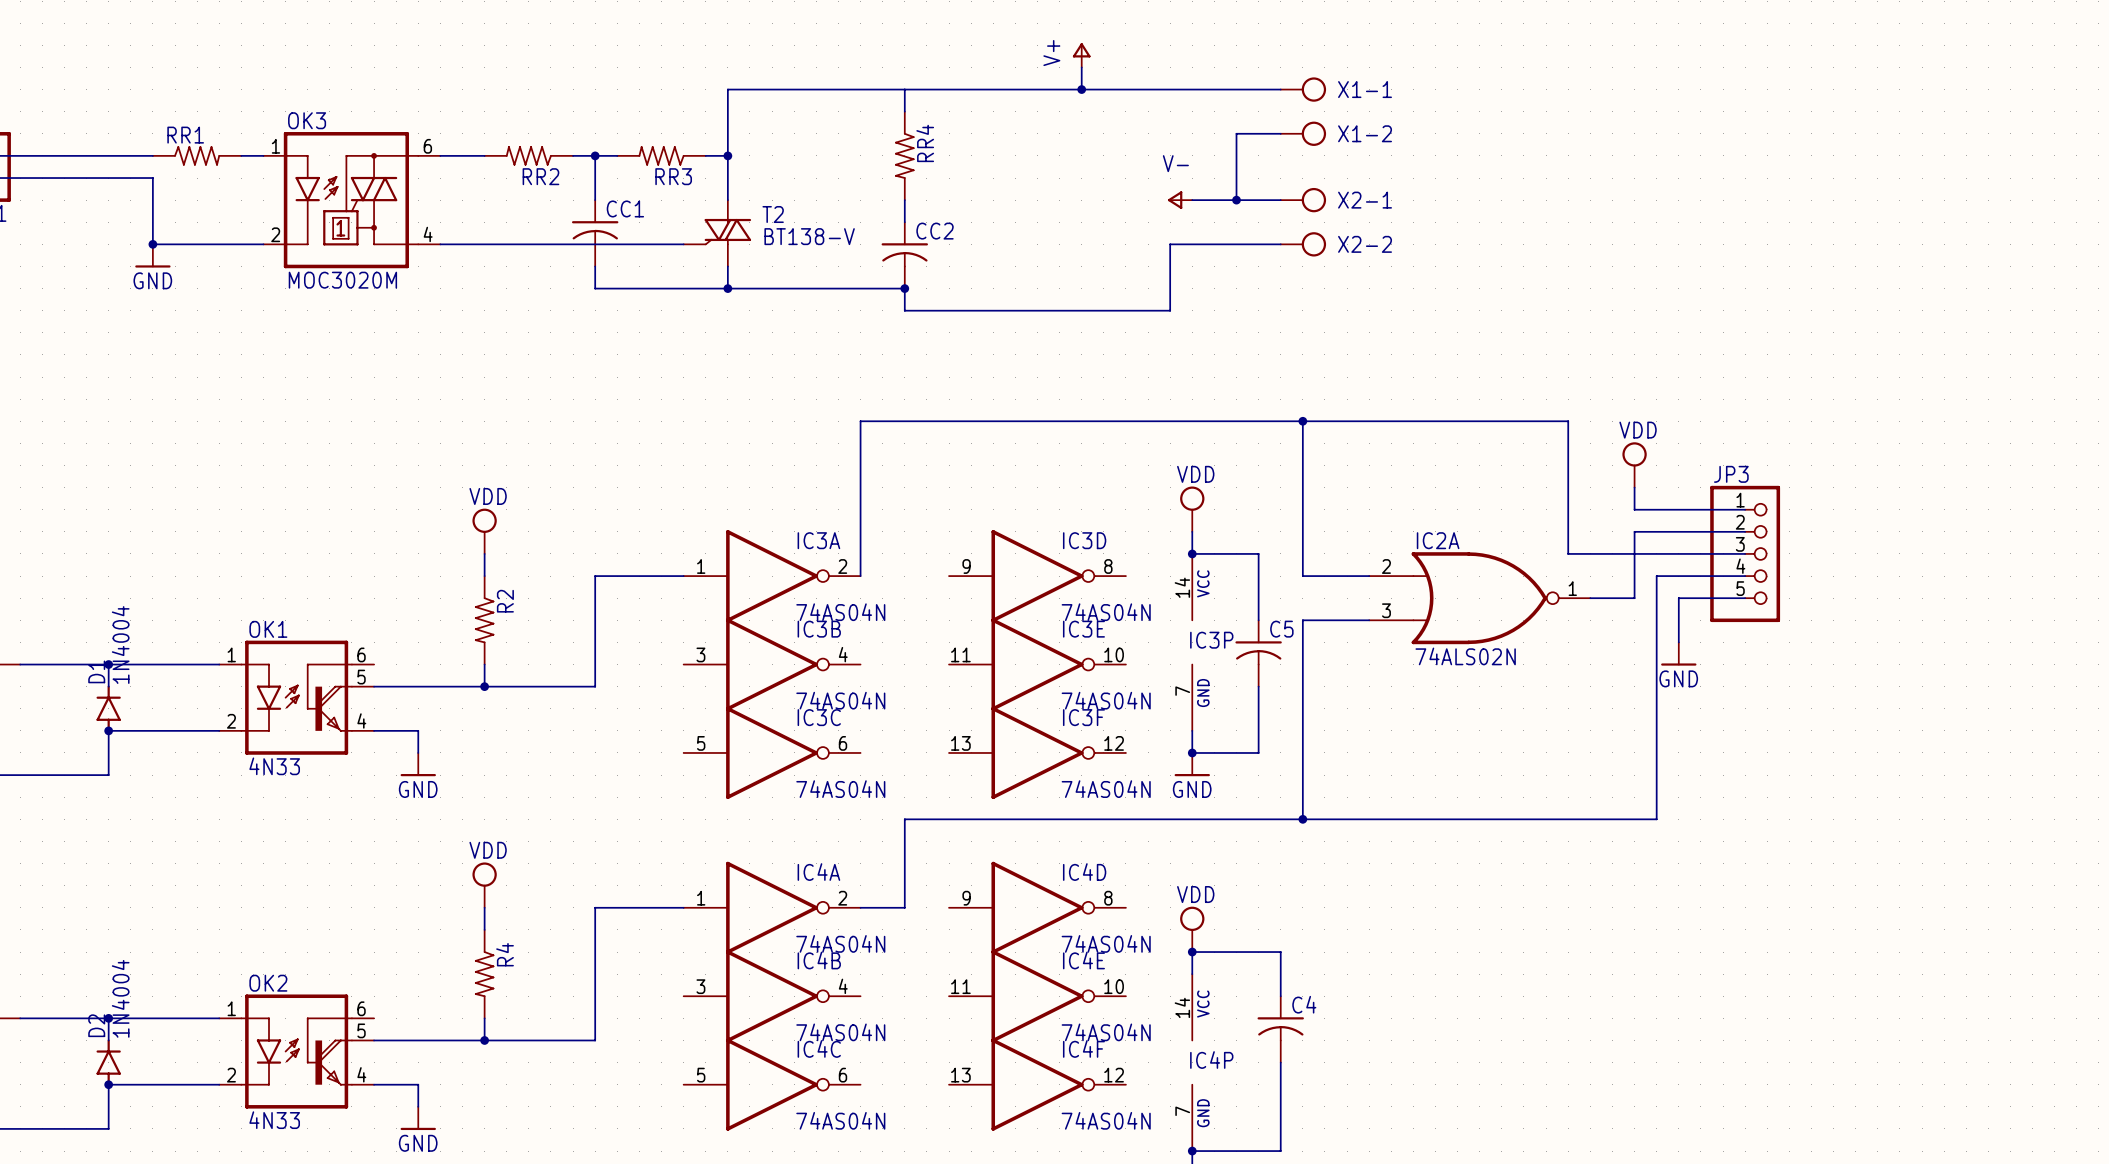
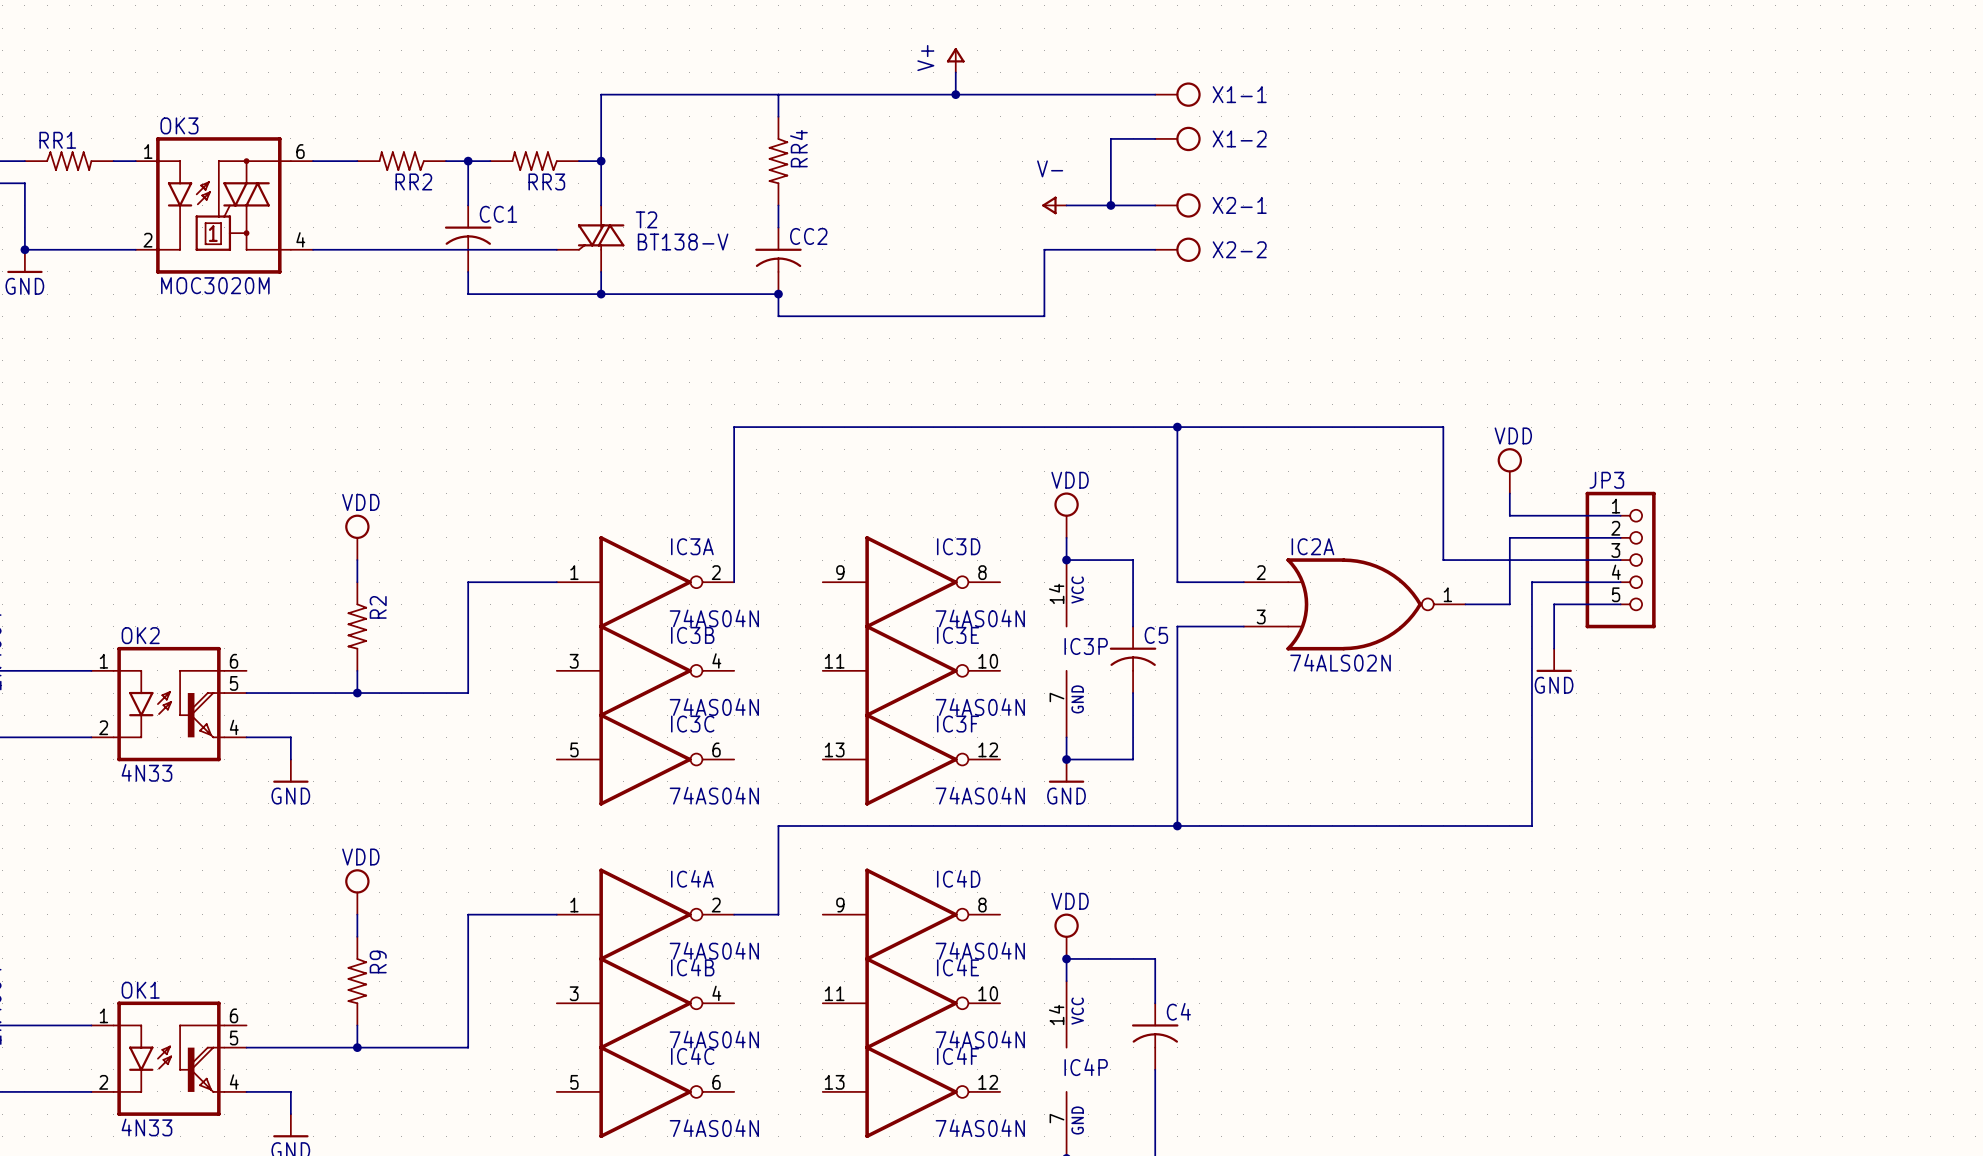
OK1 name: OK1 (268, 629) -> OK2 (140, 635)
R4 name: R4 (505, 954) -> R9 (378, 962)
OK2 name: OK2 (268, 983) -> OK1 (140, 990)

